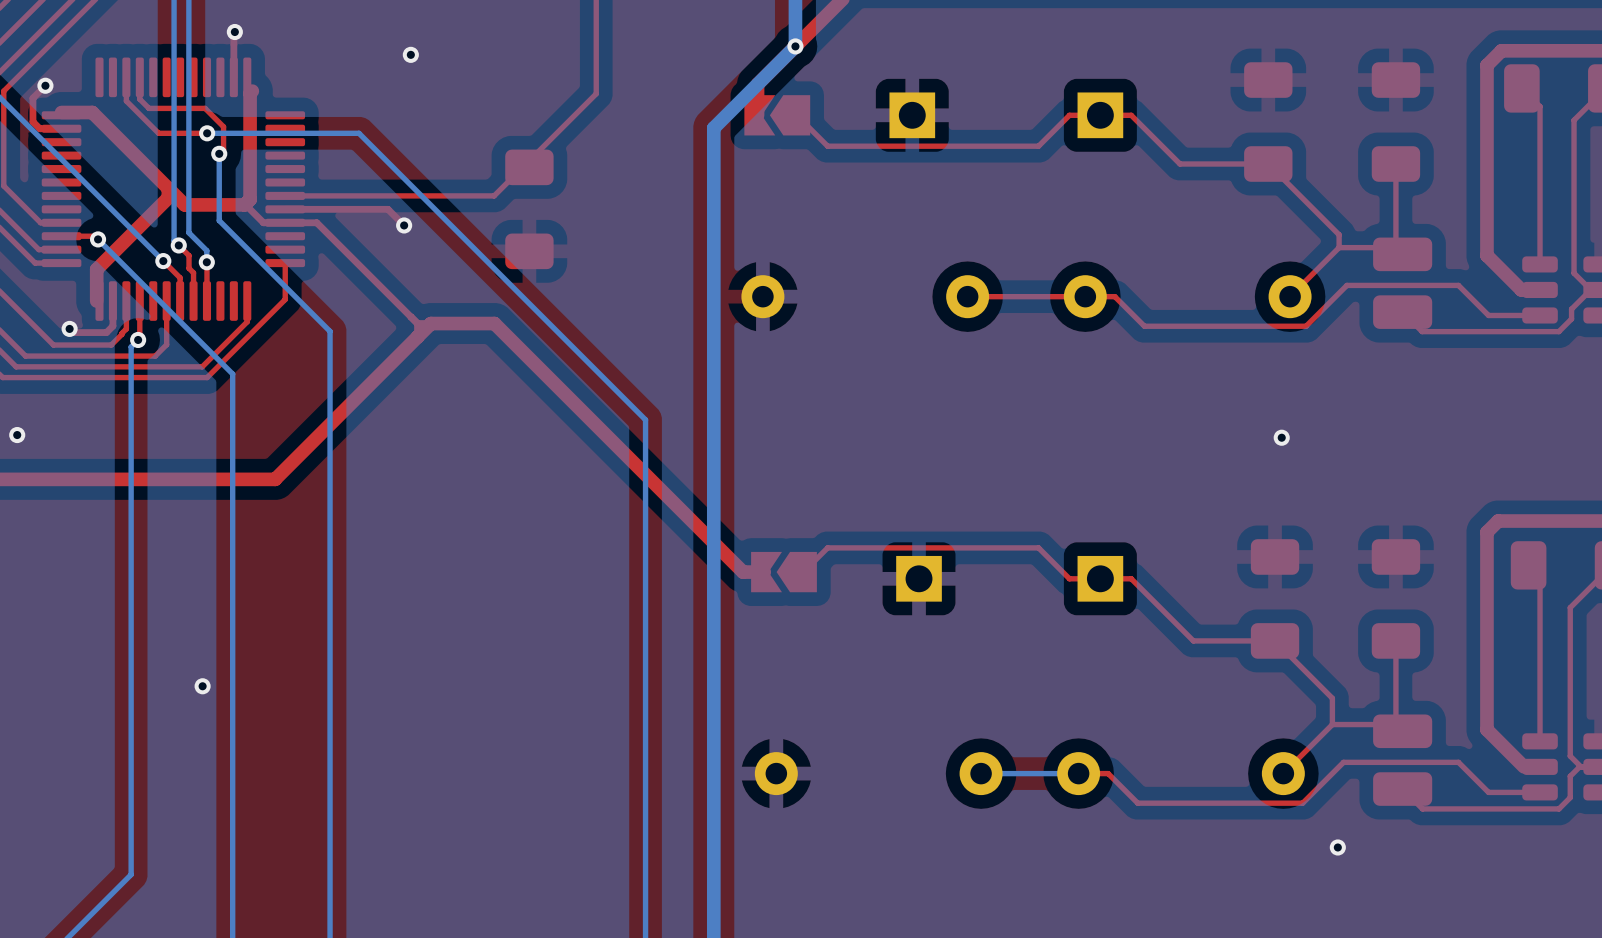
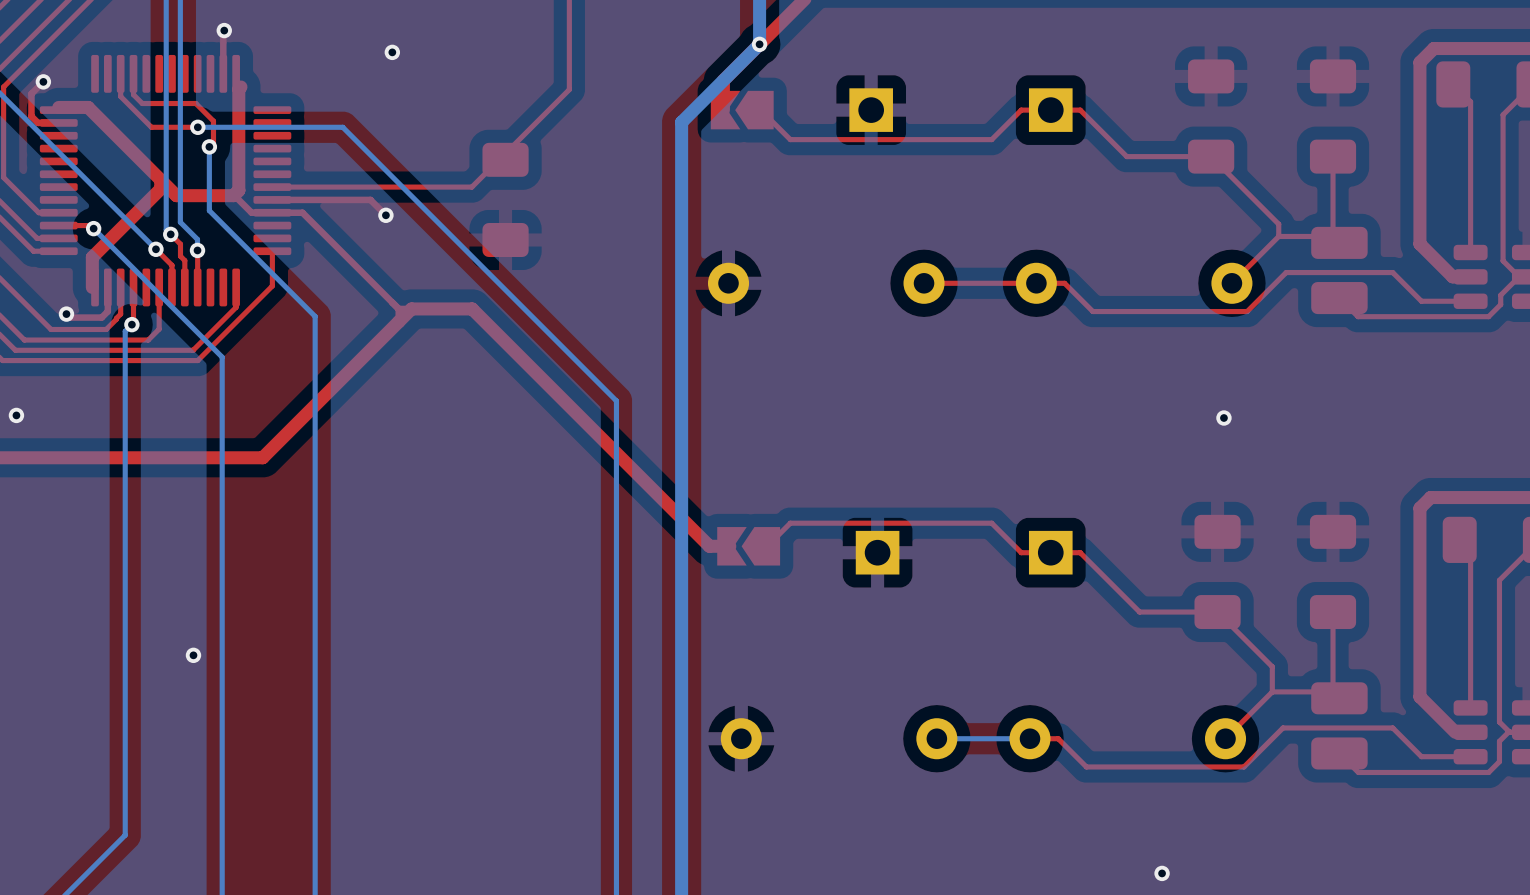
via position: (1337, 847) -> (1162, 873)

